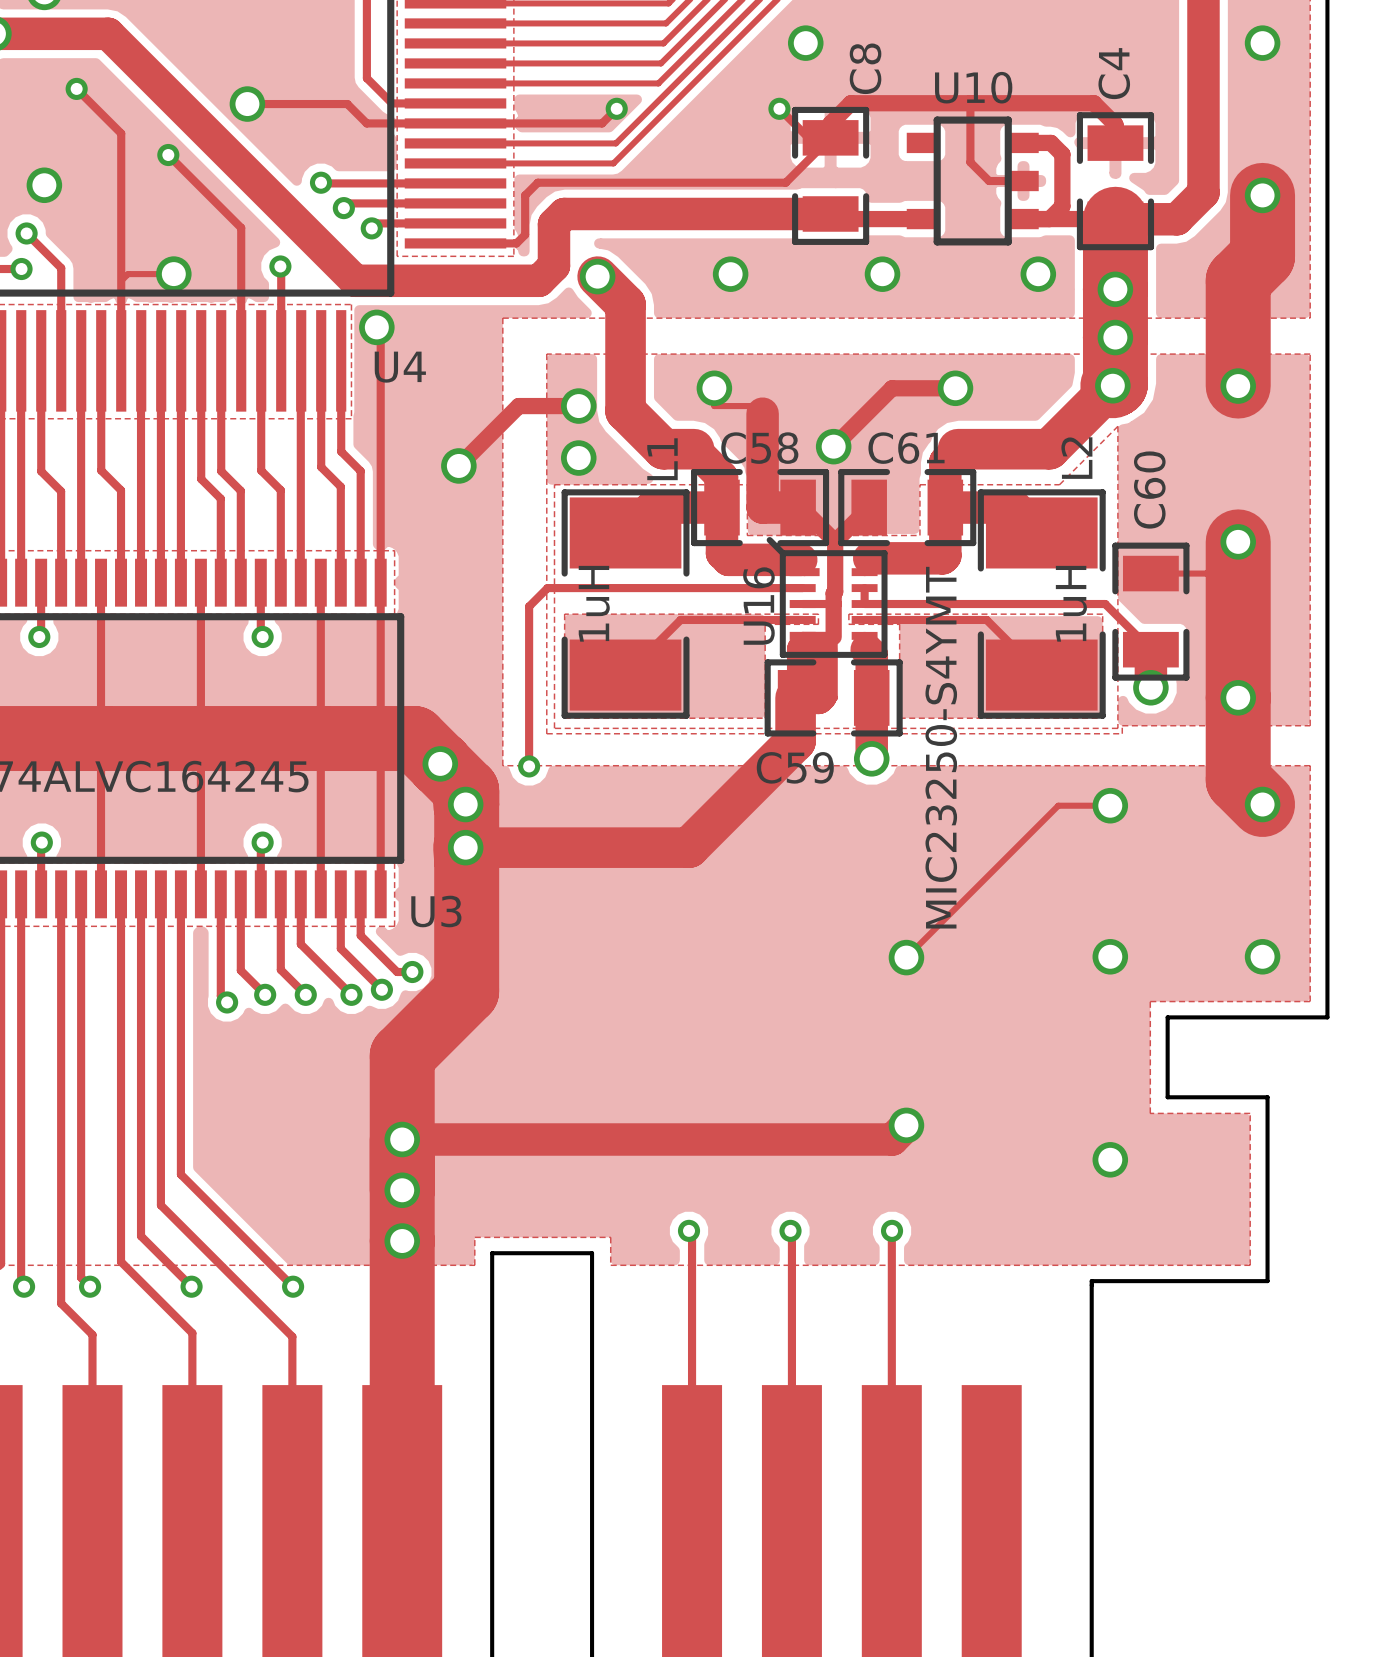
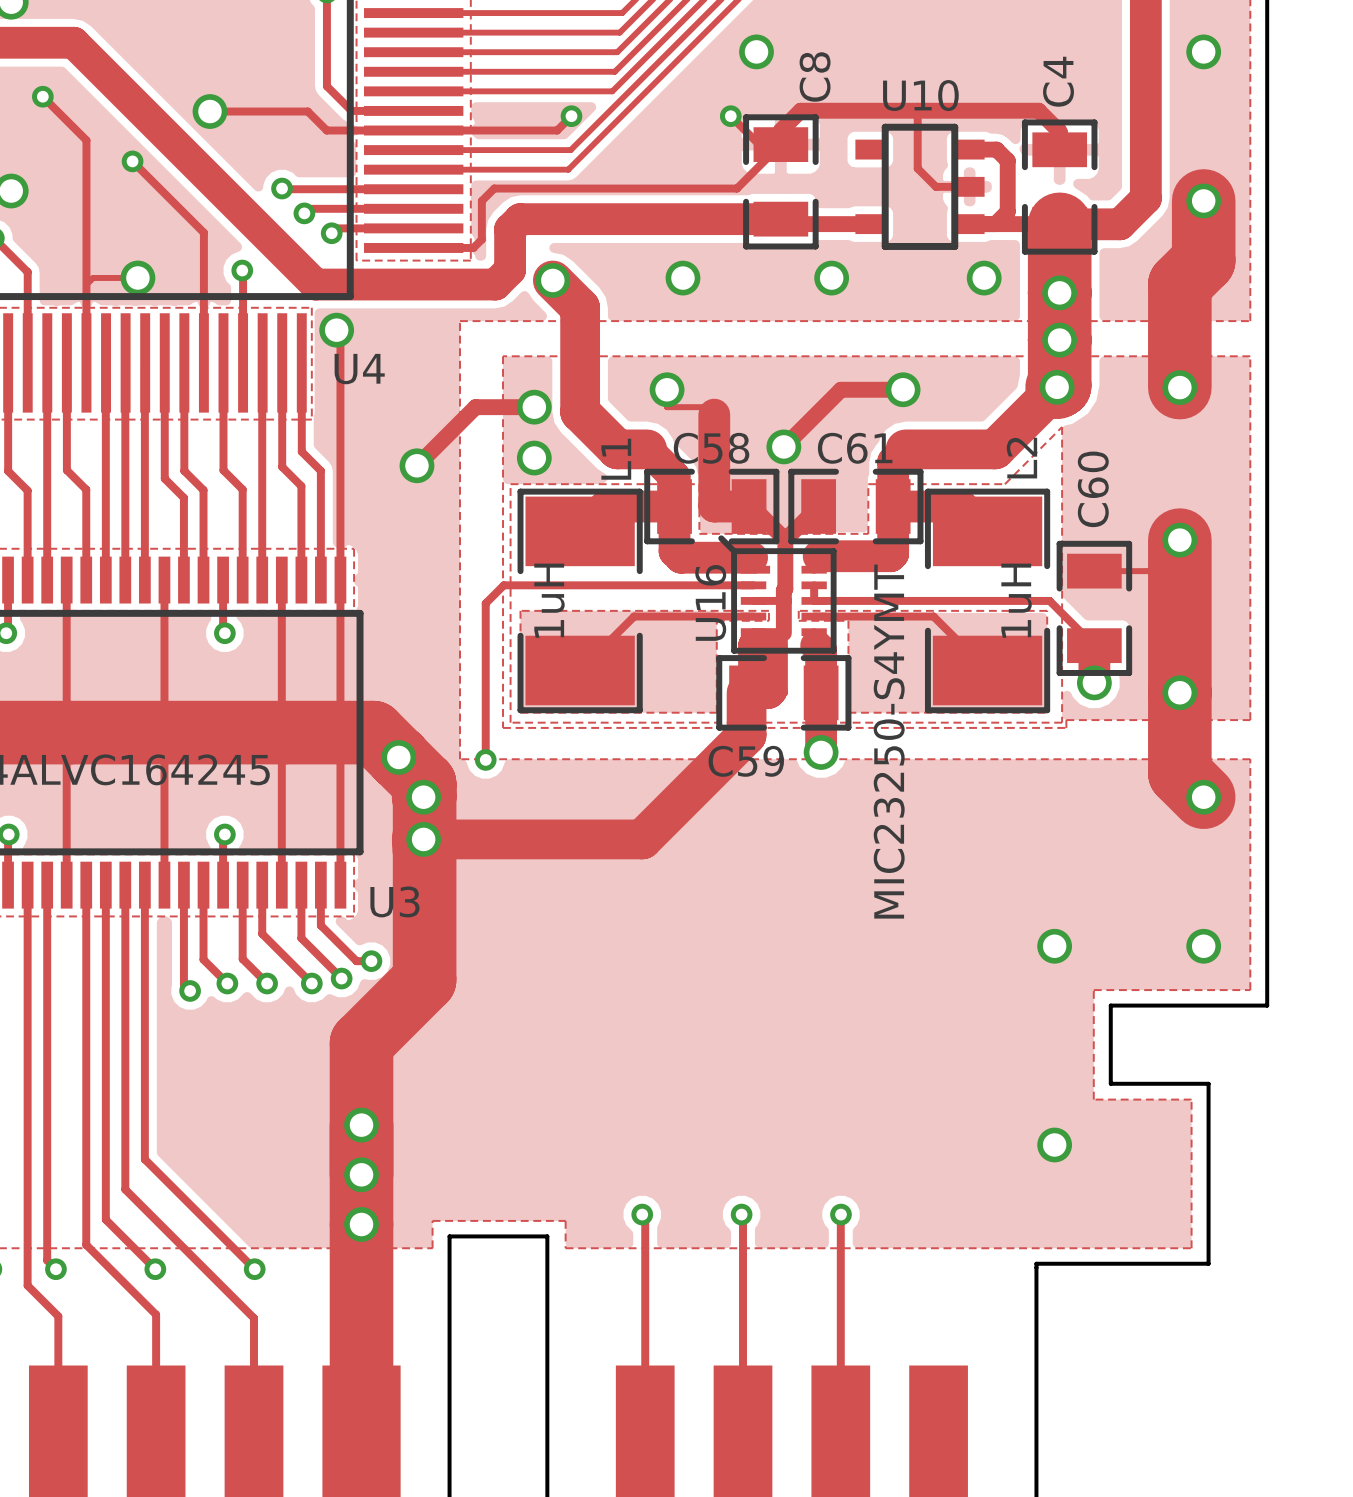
track: (1110, 805) (1058, 805) (906, 957) -> none
via: (1110, 805) -> none
via: (906, 957) -> none
track: (906, 1125) (892, 1139) (402, 1139) -> none
via: (906, 1125) -> none

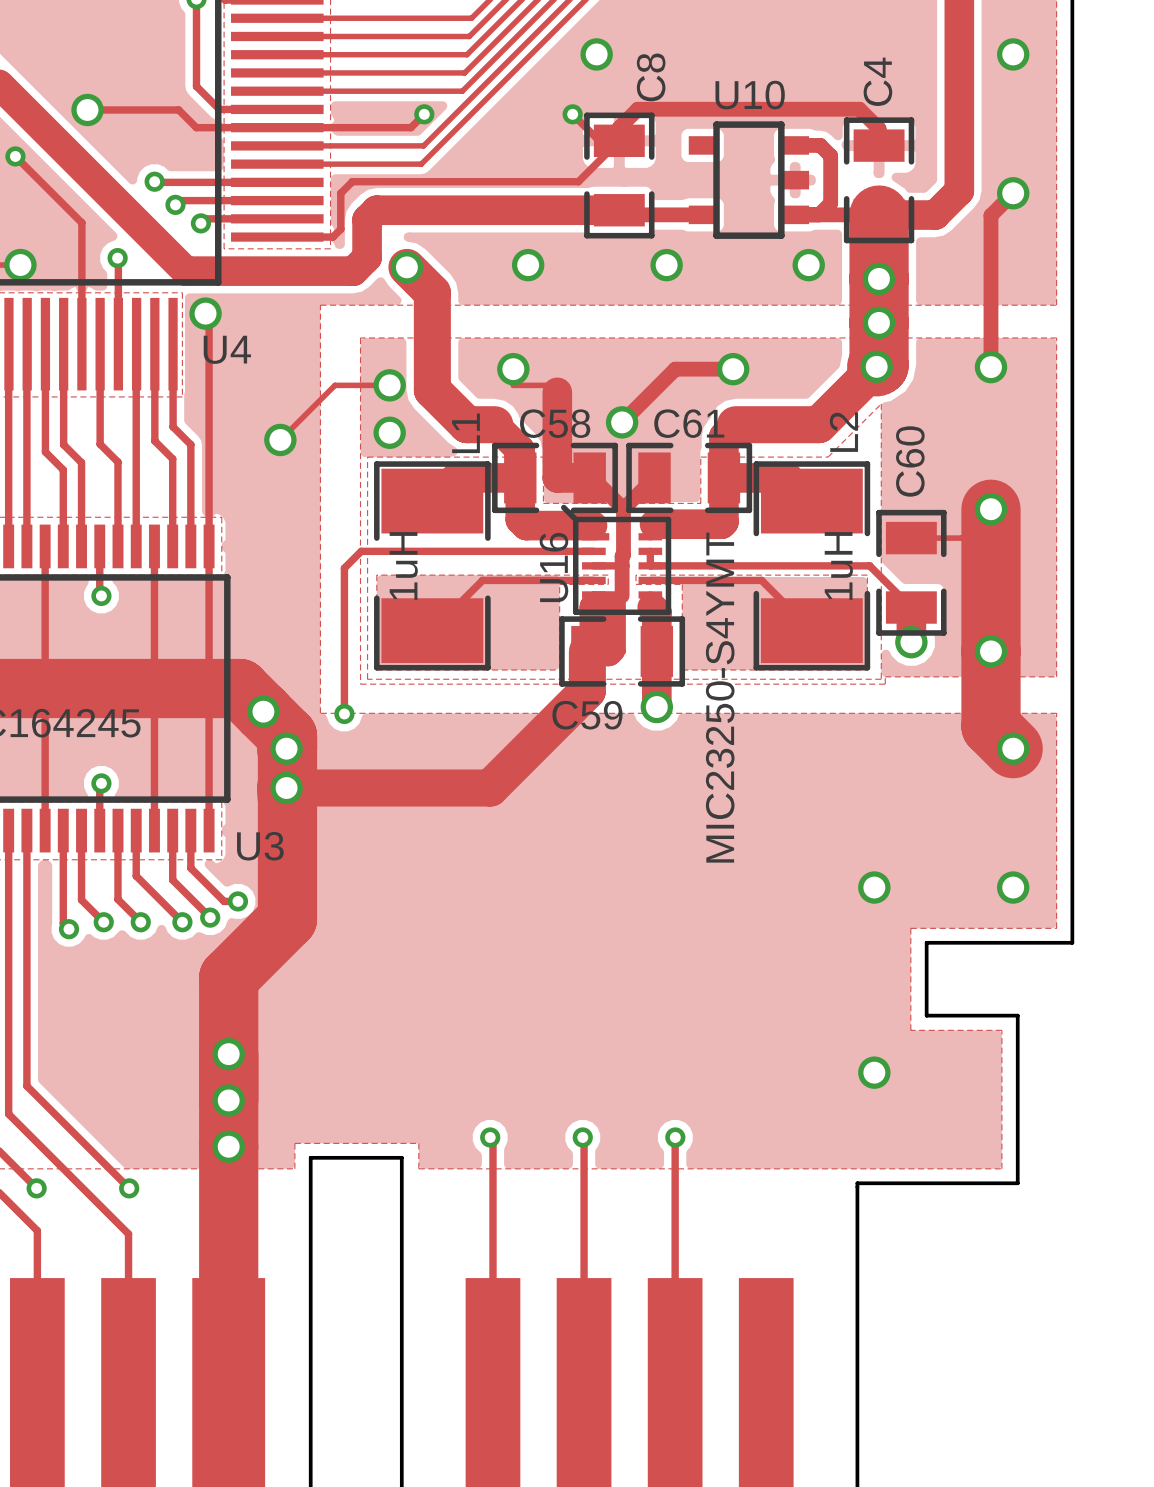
track: (917, 110) (917, 168) (935, 186) (969, 186) -> none
track: (1203, 200) (1203, 260) (1179, 284) -> (1013, 193) (990, 215) (990, 271)
track width: thick (1179, 284) (1179, 387) -> thin (990, 271) (990, 367)
track width: thick (534, 407) (475, 407) (416, 465) -> thin (389, 385) (334, 385) (280, 439)

